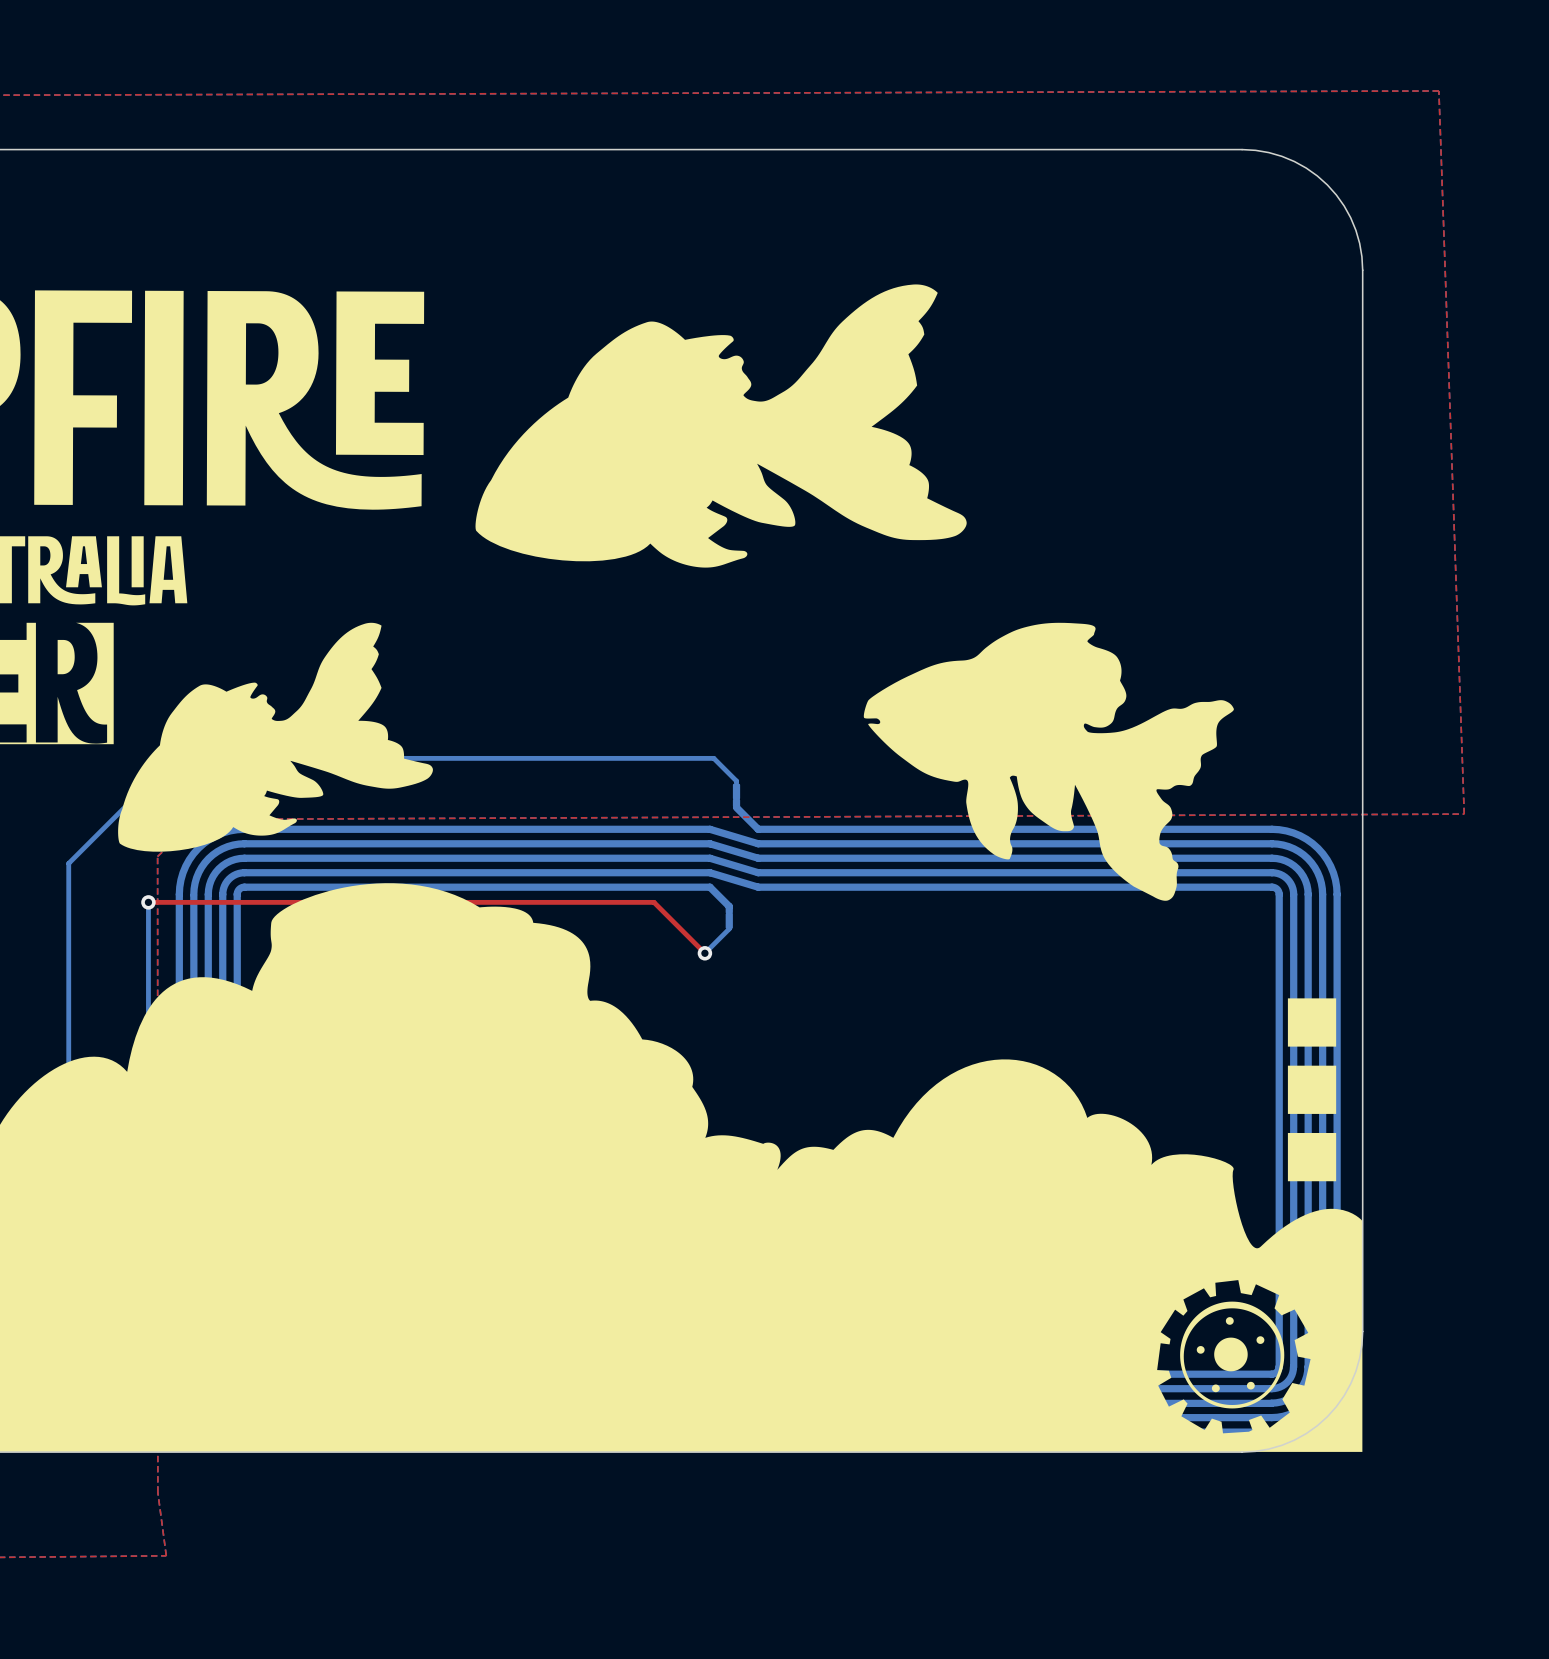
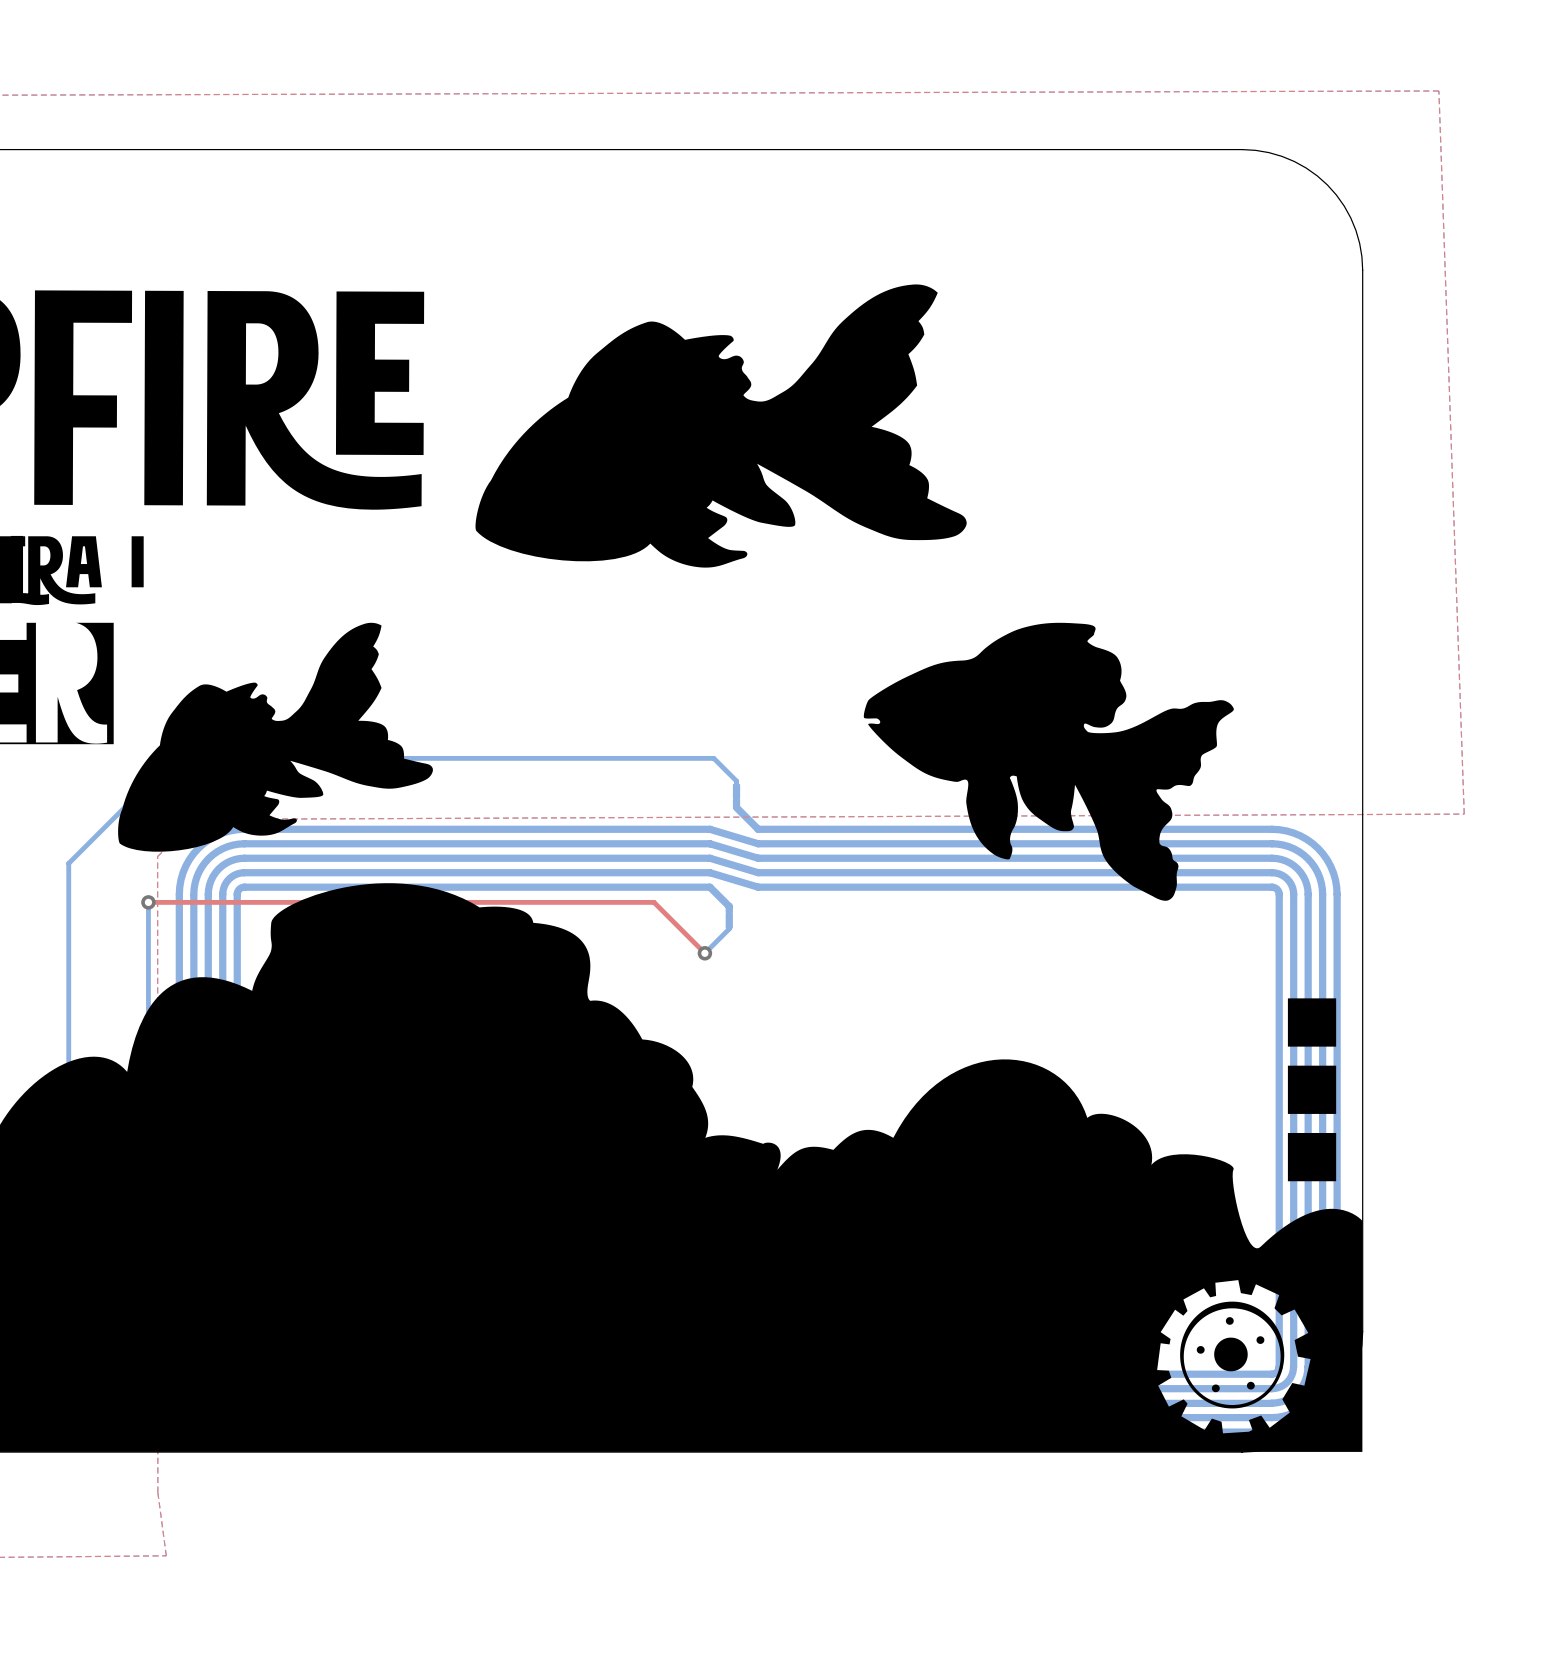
drawing: [149, 536, 188, 604] -> none
drawing position: (126, 570) -> (30, 570)
drawing: [57, 639, 75, 675] -> none

